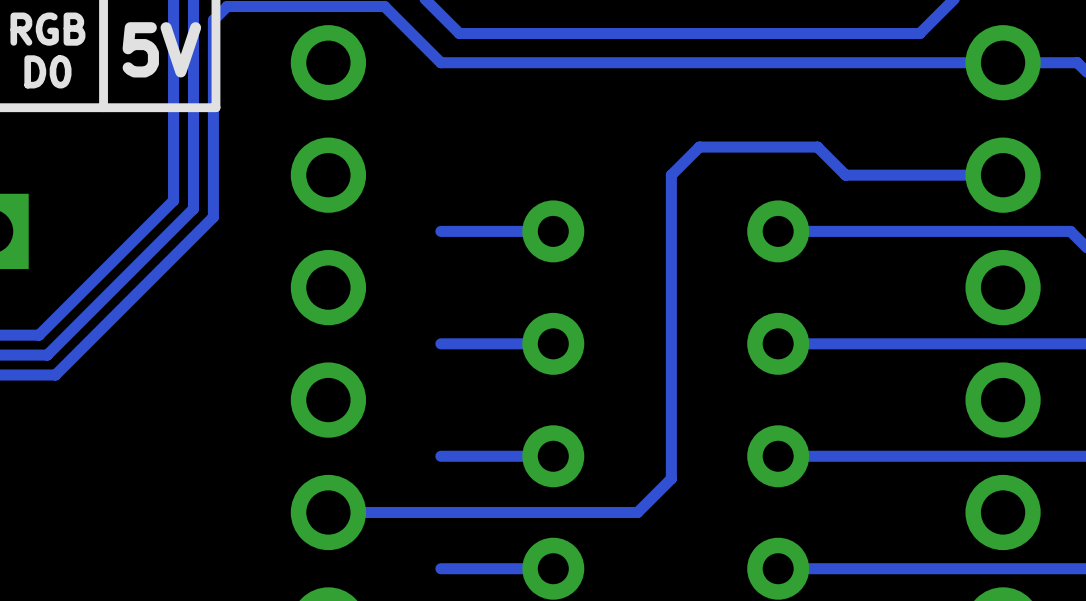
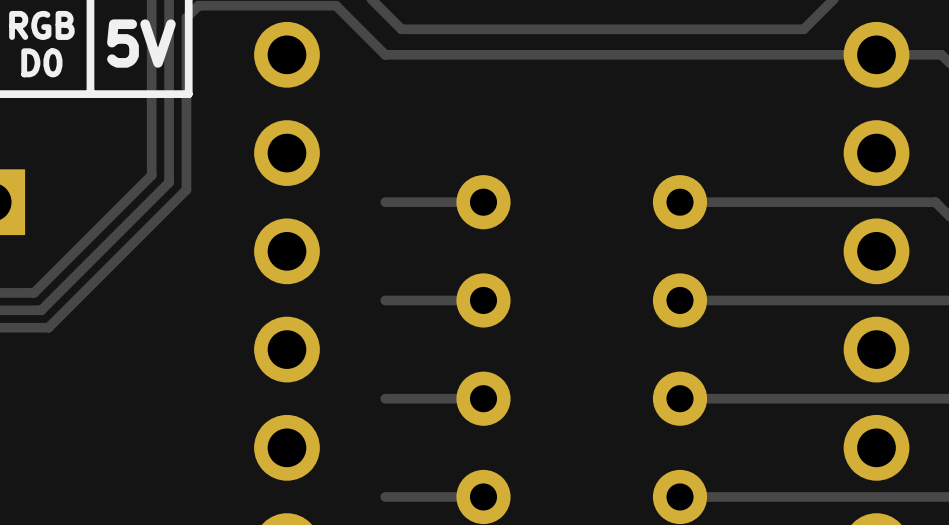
track: (1003, 175) (845, 175) (817, 147) (699, 147) (671, 175) (671, 478) (637, 512) (328, 512) -> none

